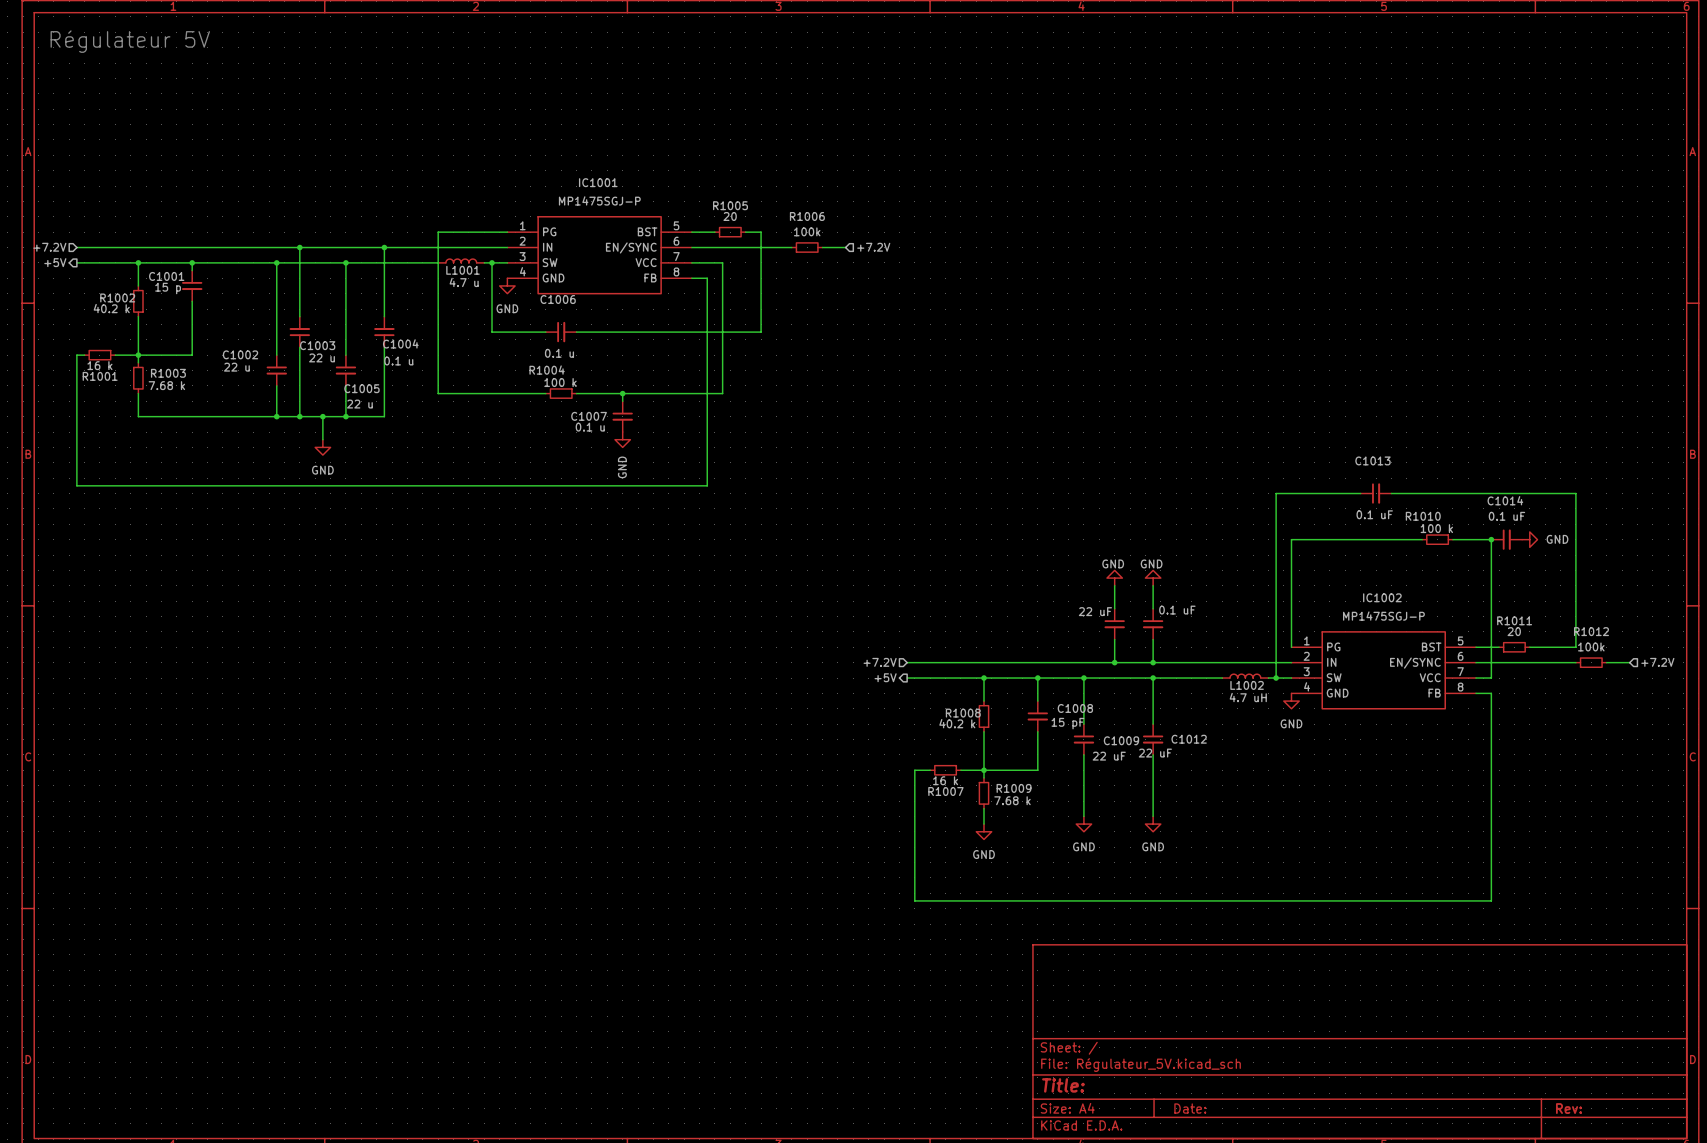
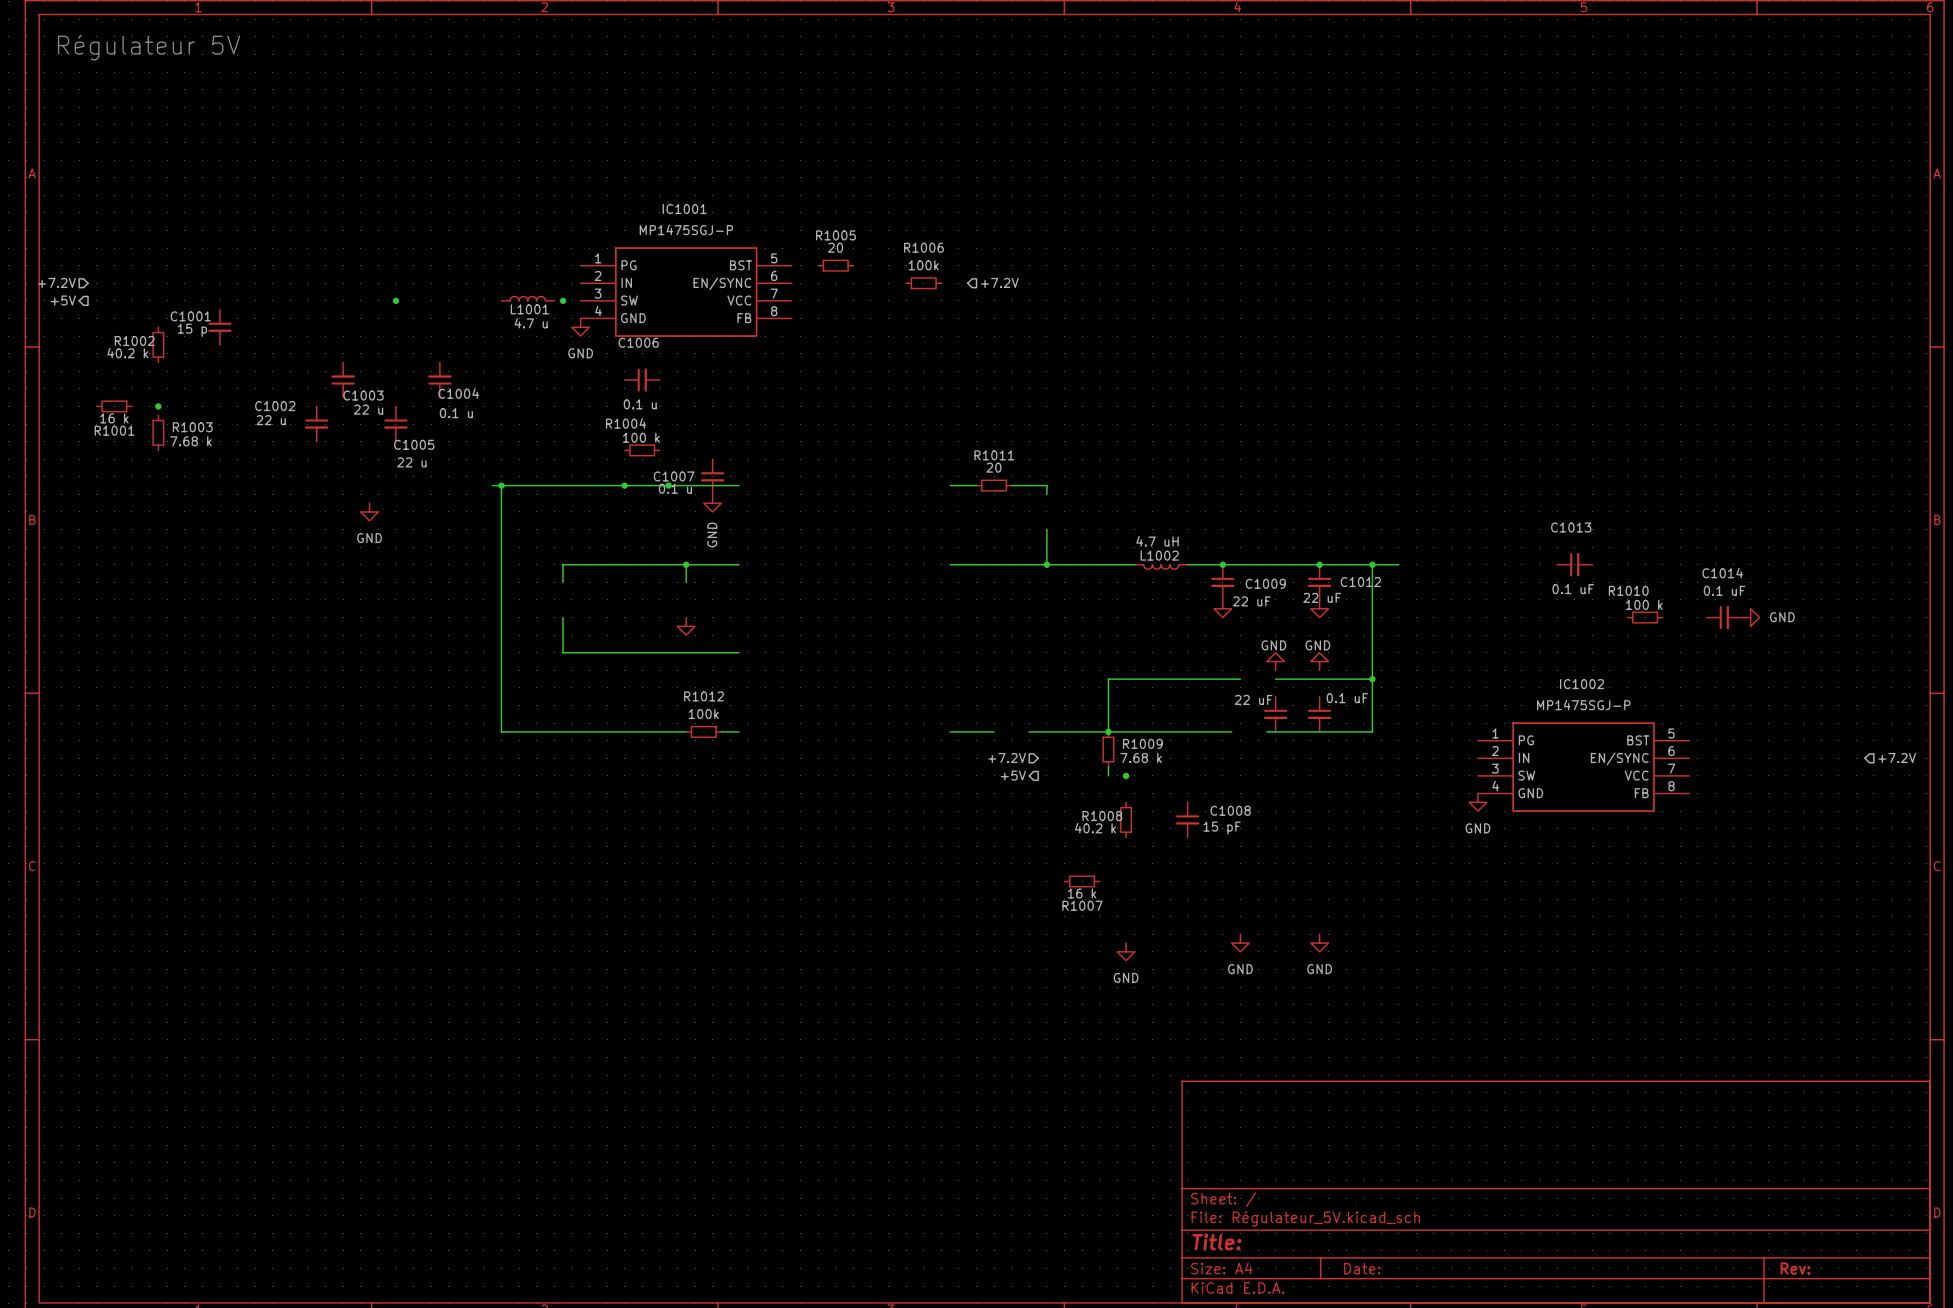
wire: (507, 232) (438, 232) (438, 393) (545, 393) -> none
wire: (691, 232) (714, 232) -> none
wire: (745, 232) (761, 232) (761, 332) (576, 332) -> none
wire: (76, 247) (507, 247) -> none
wire: (299, 247) (299, 316) -> none
junction: (299, 247) -> none
wire: (384, 247) (384, 316) -> none
junction: (384, 247) -> none
wire: (691, 247) (791, 247) -> none
wire: (822, 247) (845, 247) -> none
wire: (76, 262) (438, 262) -> none
wire: (138, 262) (138, 285) -> none
junction: (138, 262) -> none
wire: (192, 262) (192, 270) -> none
junction: (192, 262) -> none
wire: (276, 262) (276, 355) -> none
junction: (276, 262) -> none
wire: (345, 262) (345, 355) -> none
wire: (484, 262) (507, 262) -> none
wire: (492, 262) (492, 332) (545, 332) -> none
wire: (691, 262) (722, 262) (722, 393) (576, 393) -> none
wire: (691, 278) (707, 278) (707, 485) (76, 485) (76, 355) (84, 355) -> none
wire: (192, 301) (192, 355) (115, 355) -> none
wire: (138, 316) (138, 362) -> none
wire: (299, 347) (299, 416) -> none
wire: (384, 347) (384, 416) (138, 416) (138, 393) -> none
wire: (276, 385) (276, 416) -> none
wire: (345, 385) (345, 416) -> none
wire: (622, 393) (622, 401) -> none
junction: (622, 393) -> none
junction: (276, 416) -> none
junction: (299, 416) -> none
wire: (322, 416) (322, 439) -> none
junction: (322, 416) -> none
junction: (345, 416) -> none
wire: none -> (492, 485) (738, 485)
wire: none -> (501, 485) (501, 731) (686, 731)
junction: none -> (501, 485)
junction: none -> (624, 485)
junction: none -> (668, 485)
wire: none -> (950, 485) (976, 485)
wire: none -> (1011, 485) (1046, 485) (1046, 494)
wire: none -> (1046, 529) (1046, 564)
wire: none -> (686, 564) (686, 582)
junction: none -> (686, 564)
wire: none -> (738, 564) (563, 564) (563, 582)
wire: none -> (950, 564) (1134, 564)
junction: none -> (1046, 564)
wire: none -> (1187, 564) (1398, 564)
junction: none -> (1222, 564)
junction: none -> (1319, 564)
wire: none -> (1372, 564) (1372, 731) (1266, 731)
junction: none -> (1372, 564)
wire: (1360, 493) (1276, 493) (1276, 678) -> none
wire: (1391, 493) (1575, 493) (1575, 647) (1529, 647) -> none
power symbol: none -> (1222, 608)
power symbol: none -> (1319, 608)
wire: none -> (563, 617) (563, 652) (738, 652)
wire: (1422, 539) (1291, 539) (1291, 647) -> none
wire: (1452, 539) (1491, 539) (1491, 678) (1475, 678) -> none
junction: (1491, 539) -> none
power symbol: none -> (686, 626)
wire: (1114, 585) (1114, 608) -> none
wire: (1153, 585) (1153, 608) -> none
wire: none -> (1240, 679) (1108, 679) (1108, 731)
wire: none -> (1275, 679) (1372, 679)
junction: none -> (1372, 679)
wire: none -> (721, 731) (738, 731)
wire: none -> (950, 731) (994, 731)
wire: none -> (1029, 731) (1231, 731)
junction: none -> (1108, 731)
wire: (1114, 639) (1114, 662) -> none
wire: (1153, 639) (1153, 662) -> none
wire: (1475, 647) (1499, 647) -> none
R1011 position: (1514, 647) -> (994, 485)
wire: (907, 662) (1291, 662) -> none
junction: (1114, 662) -> none
junction: (1153, 662) -> none
wire: (1475, 662) (1575, 662) -> none
R1012 position: (1591, 662) -> (703, 731)
wire: (1606, 662) (1629, 662) -> none
wire: none -> (1108, 767) (1108, 775)
L1002 rotation: 0° (1245, 676) -> 180° (1161, 566)
L1002 position: (1245, 676) -> (1161, 566)
wire: (907, 678) (1222, 678) -> none
wire: (984, 678) (984, 701) -> none
wire: (1037, 678) (1037, 701) -> none
junction: (1037, 678) -> none
wire: (1083, 678) (1083, 724) -> none
junction: (1083, 678) -> none
wire: (1153, 678) (1153, 724) -> none
junction: (1153, 678) -> none
wire: (1268, 678) (1291, 678) -> none
junction: (1276, 678) -> none
wire: (1475, 693) (1491, 693) (1491, 900) (914, 900) (914, 770) (930, 770) -> none
wire: (984, 731) (984, 777) -> none
wire: (1037, 731) (1037, 770) (960, 770) -> none
C1009 position: (1083, 739) -> (1222, 582)
C1012 position: (1153, 739) -> (1319, 582)
wire: (1083, 754) (1083, 816) -> none
wire: (1153, 754) (1153, 816) -> none
junction: (984, 770) -> none
R1009 position: (984, 793) -> (1108, 749)
wire: (984, 808) (984, 824) -> none

